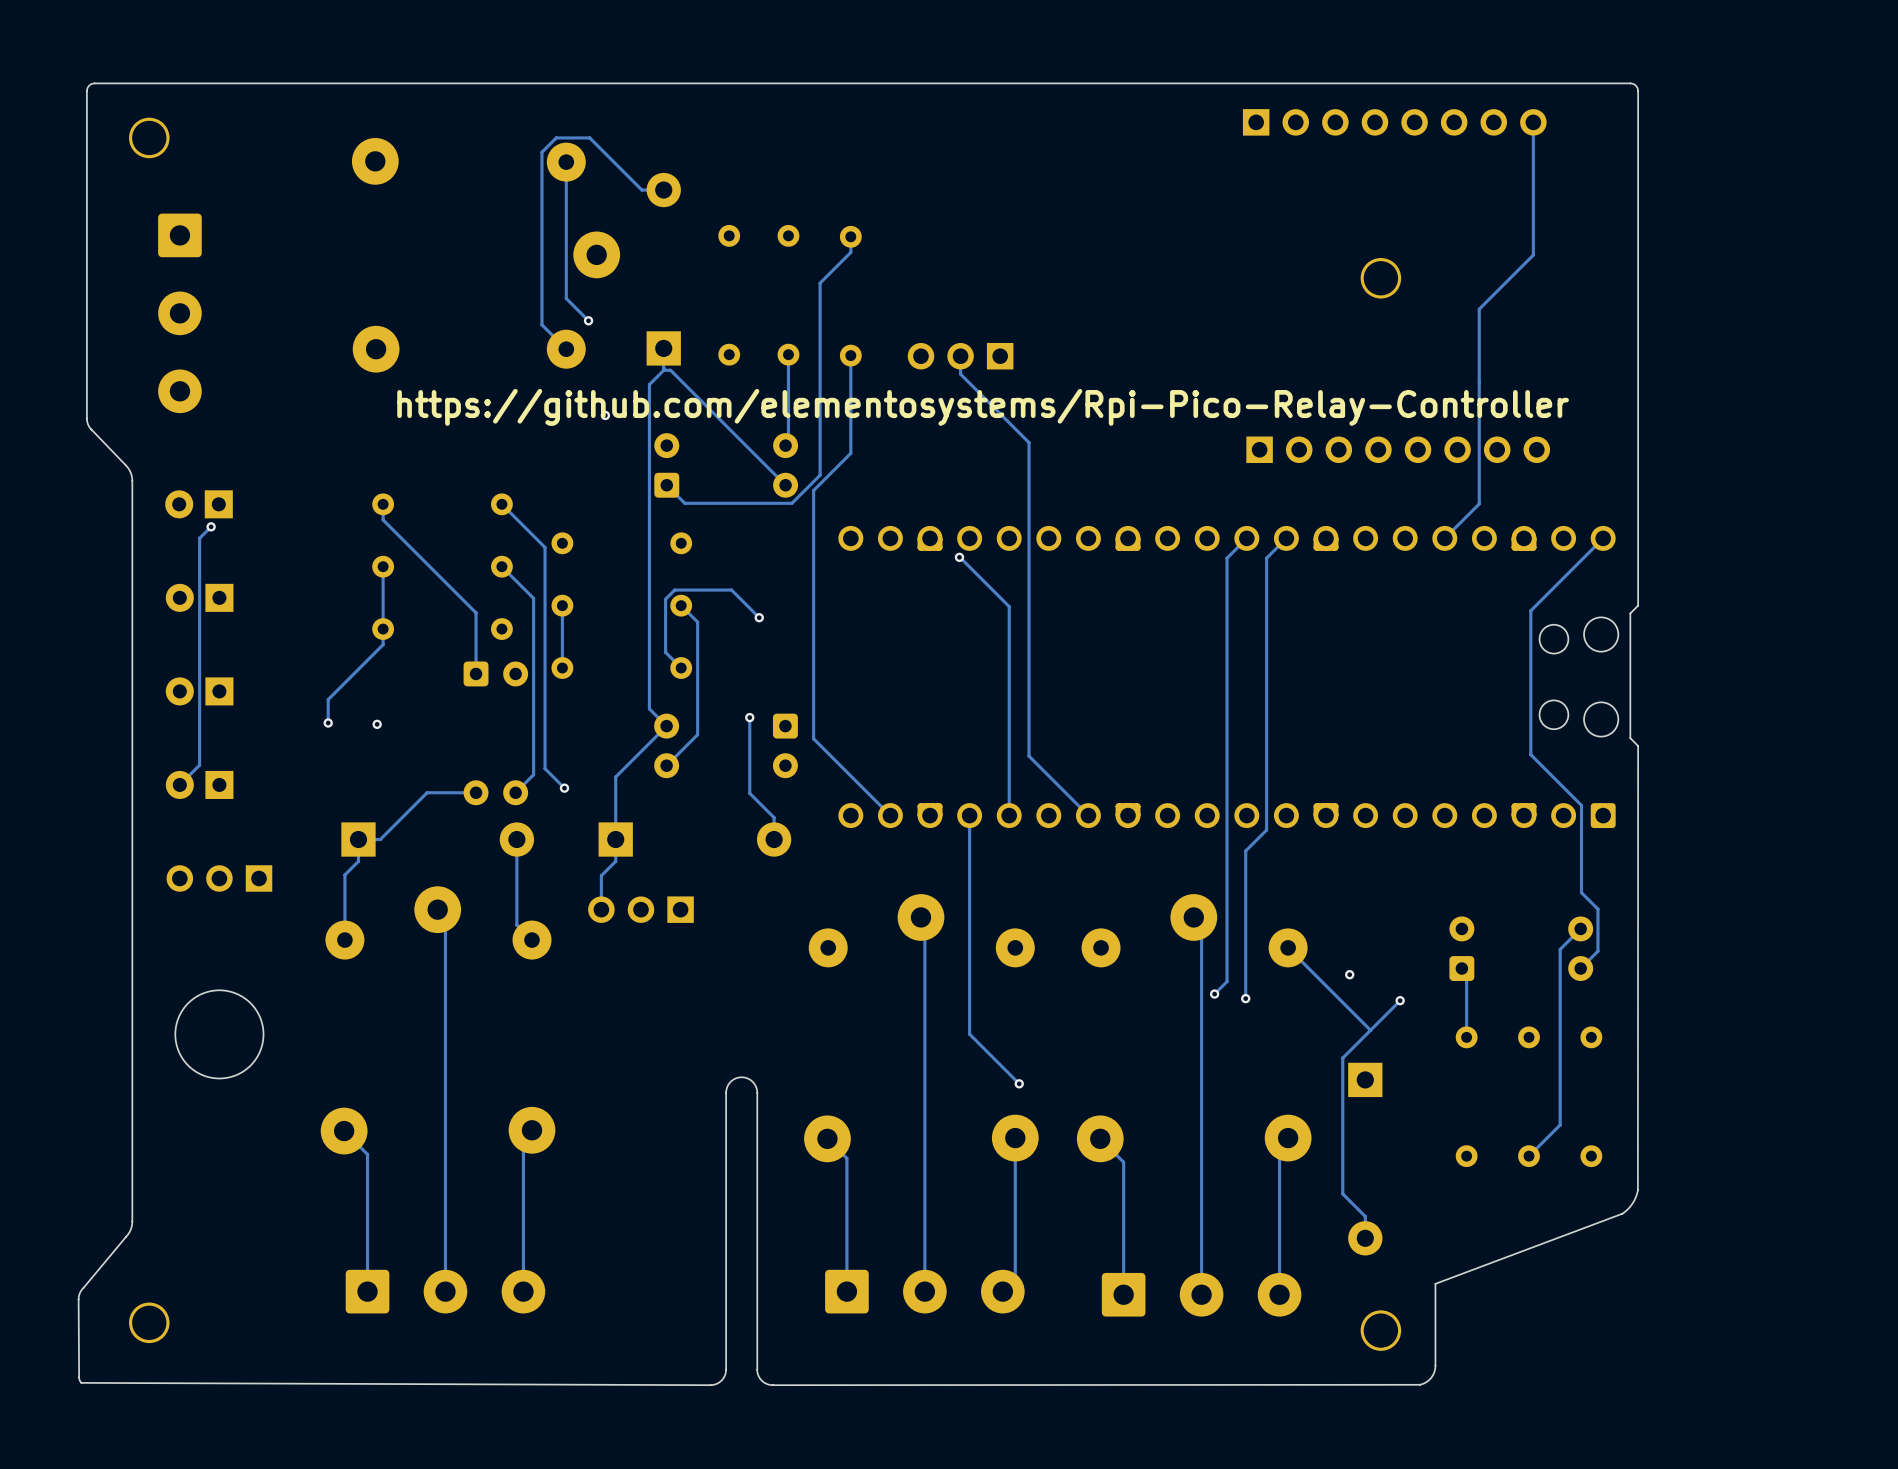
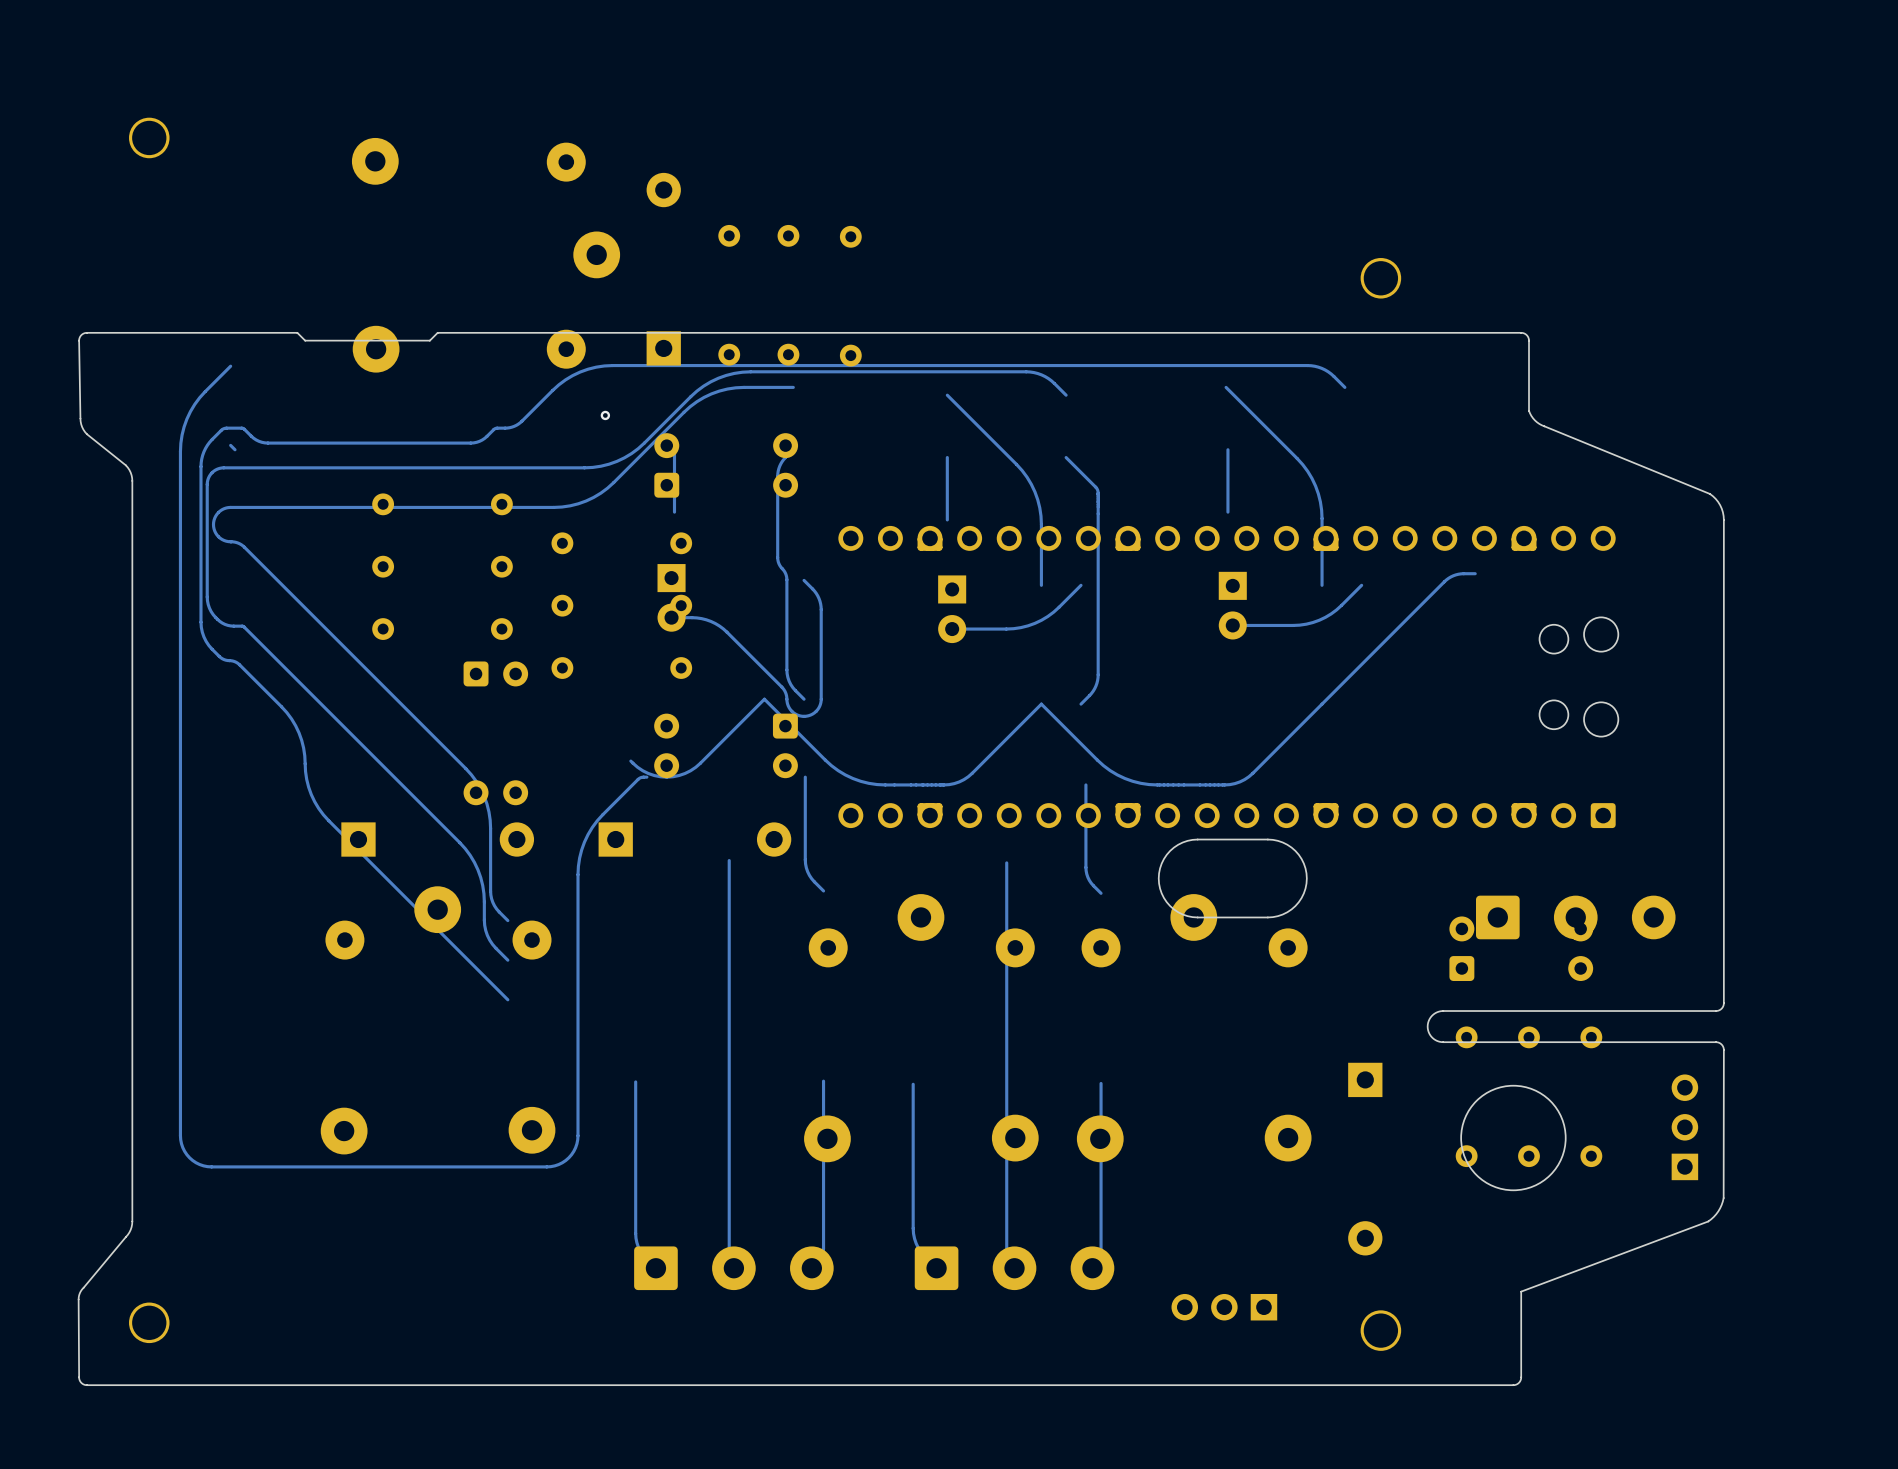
part: (1394, 122) -> none
track: (1533, 122) (1533, 255) (1479, 309) (1479, 503) (1444, 538) -> none
track: (566, 162) (566, 298) (588, 320) -> none
track: (663, 190) (641, 190) (589, 137) (556, 137) (541, 152) (541, 324) (566, 349) -> none
track: (850, 236) (850, 252) (820, 283) (820, 475) (791, 503) (684, 503) (666, 485) -> none
part: (179, 313) -> none
via: (588, 320) -> none
track: (788, 354) (788, 442) (785, 445) -> none
track: (850, 355) (850, 453) (813, 490) (813, 738) (890, 815) -> none
track: (960, 356) (960, 374) (1029, 442) (1029, 756) (1088, 815) -> none
part: (960, 356) -> none
track: none -> (230, 366) (194, 404) (184, 426) (180, 443) (180, 1135) (182, 1147) (189, 1157) (199, 1164) (211, 1166) (546, 1166) (558, 1164) (565, 1160) (575, 1147) (578, 1135) (578, 874) (579, 858) (584, 842) (597, 820) (638, 778) (646, 777)
track: (663, 370) (670, 370) (785, 485) -> none
track: (663, 370) (649, 384) (649, 708) (666, 726) (615, 777) (615, 861) (601, 875) (601, 909) -> none
track: none -> (793, 387) (735, 387) (719, 391) (704, 397) (684, 412) (607, 488) (586, 500) (570, 505) (553, 507) (230, 507) (222, 509) (215, 516) (213, 526) (218, 536) (244, 547) (465, 768) (476, 781) (486, 803) (490, 820) (491, 898) (496, 909) (507, 920)
track: none -> (1226, 387) (1297, 458) (1312, 478) (1318, 493) (1321, 510) (1322, 585)
track: none -> (1344, 387) (1325, 369) (1307, 365) (612, 365) (596, 367) (572, 375) (558, 384) (518, 424) (509, 427) (495, 428) (482, 440) (473, 442) (267, 443) (256, 439) (242, 428) (222, 429) (207, 445) (201, 462) (200, 622) (206, 641) (220, 657) (239, 664) (291, 719) (299, 732) (303, 748) (308, 787) (314, 801) (323, 814) (507, 999)
track: none -> (947, 395) (1016, 464) (1031, 484) (1037, 499) (1041, 516) (1041, 585)
track: none -> (1066, 395) (1048, 378) (1030, 371) (742, 372) (726, 375) (703, 386) (638, 448) (616, 461) (601, 466) (584, 467) (223, 467) (212, 472) (207, 484) (207, 596) (211, 611) (225, 624) (244, 626) (465, 848) (474, 862) (480, 877) (483, 893) (484, 925) (487, 935) (492, 944) (507, 960)
text: https://github.com/elementosystems/Rpi-Pico-Relay-Controller (983, 407) -> none
track: none -> (230, 445) (235, 449)
track: none -> (793, 449) (782, 461) (777, 473) (777, 557) (786, 578) (787, 673) (790, 684) (804, 699)
track: none -> (1227, 449) (1227, 512)
part: (1398, 449) -> none
track: none -> (947, 457) (947, 519)
track: none -> (1066, 457) (1095, 487) (1098, 492) (1098, 677) (1093, 691) (1081, 704)
board edge: (125, 465) (90, 428) (86, 420) (86, 91) (88, 86) (92, 83) (1630, 83) (1636, 86) (1638, 91) (1638, 605) (1630, 613) (1630, 738) (1638, 745) (1637, 1190) (1632, 1203) (1622, 1213) (1435, 1283) (1435, 1367) (1431, 1378) (1419, 1384) (772, 1385) (761, 1380) (757, 1369) -> (125, 465) (86, 434) (81, 424) (79, 340) (80, 335) (84, 333) (297, 332) (305, 340) (429, 340) (437, 332) (1524, 333) (1529, 340) (1529, 410) (1534, 420) (1541, 425) (1709, 493) (1718, 501) (1722, 512) (1723, 1004) (1721, 1008) (1716, 1011) (1441, 1011) (1430, 1017) (1428, 1022) (1428, 1030) (1433, 1038) (1443, 1042) (1719, 1043) (1723, 1049) (1723, 1198) (1718, 1211) (1708, 1221) (1521, 1291) (1521, 1378) (1518, 1382) (1514, 1385) (86, 1385) (81, 1382) (79, 1377)
part: (199, 504) -> none
track: (383, 504) (383, 519) (476, 612) (476, 673) -> none
track: (501, 504) (545, 547) (545, 768) (564, 788) -> none
track: (211, 526) (199, 538) (199, 765) (179, 784) -> none
via: (211, 526) -> none
track: (1246, 538) (1227, 558) (1227, 981) (1214, 994) -> none
track: (1286, 538) (1266, 558) (1266, 830) (1245, 850) (1245, 998) -> none
track: (1603, 538) (1530, 610) (1530, 754) (1581, 805) (1581, 892) (1597, 909) (1597, 951) (1580, 968) -> none
track: (959, 557) (1009, 606) (1009, 815) -> none
via: (959, 557) -> none
track: (383, 566) (383, 644) (328, 699) (328, 722) -> none
track: (501, 566) (533, 598) (533, 774) (515, 792) -> none
track: none -> (1475, 573) (1458, 574) (1446, 579) (1252, 773) (1235, 783) (1157, 784) (1140, 783) (1124, 778) (1103, 765) (1041, 704) (968, 776) (949, 784) (877, 784) (852, 778) (831, 765) (764, 699) (700, 763) (685, 773) (666, 777) (654, 775) (642, 770) (630, 761)
track: none -> (804, 580) (817, 595) (821, 609) (821, 700) (817, 710) (808, 715) (799, 715) (791, 711) (782, 688) (719, 625) (701, 618) (671, 617)
track: none -> (1081, 585) (1053, 612) (1028, 625) (1006, 629) (952, 629)
track: none -> (1361, 585) (1336, 609) (1313, 622) (1293, 625) (1232, 625)
part: (199, 597) -> none
part: none -> (671, 597)
track: (562, 605) (562, 668) -> (674, 449) (674, 512)
track: (681, 605) (697, 622) (697, 734) (666, 765) -> none
part: none -> (1232, 605)
part: none -> (952, 609)
track: (759, 617) (731, 590) (674, 590) (665, 599) (665, 652) (681, 668) -> none
via: (759, 617) -> none
part: (199, 691) -> none
track: (749, 717) (749, 793) (774, 817) (774, 839) -> none
via: (749, 717) -> none
via: (328, 722) -> none
via: (377, 724) -> none
track: none -> (805, 777) (805, 863) (809, 875) (823, 890)
part: (199, 784) -> none
track: none -> (1085, 784) (1086, 870) (1089, 880) (1101, 893)
via: (564, 788) -> none
track: (476, 792) (427, 792) (380, 839) (358, 839) (358, 861) (344, 874) (344, 940) -> none
track: (969, 815) (969, 1034) (1019, 1083) -> none
track: (516, 839) (516, 924) (532, 940) -> none
board edge: none -> (1267, 839) (1197, 839) (1178, 844) (1166, 854) (1160, 868) (1159, 883) (1163, 897) (1173, 909) (1192, 917) (1267, 917) (1287, 912) (1298, 902) (1303, 893) (1306, 883) (1305, 868) (1298, 854) (1291, 847) (1277, 840) (1267, 839)
track: none -> (729, 860) (729, 1260) (733, 1268)
track: none -> (1006, 862) (1006, 1254) (1008, 1261) (1014, 1268)
part: (219, 878) -> none
track: (437, 909) (445, 917) (445, 1291) -> none
part: (640, 909) -> none
track: (920, 917) (924, 921) (924, 1291) -> none
track: (1193, 917) (1201, 925) (1201, 1294) -> none
part: none -> (1575, 917)
track: (1580, 928) (1560, 949) (1560, 1124) (1529, 1156) -> none
track: (1288, 947) (1370, 1030) -> none
track: (1461, 968) (1466, 973) (1466, 1037) -> none
via: (1349, 974) -> none
round board edge: [174, 989, 264, 1079] -> none
via: (1214, 994) -> none
via: (1245, 998) -> none
track: (1400, 1000) (1370, 1030) -> none
via: (1400, 1000) -> none
track: (1370, 1030) (1342, 1058) (1342, 1193) (1365, 1216) (1365, 1238) -> none
track: none -> (635, 1081) (635, 1238) (640, 1250) (655, 1268)
track: none -> (823, 1081) (823, 1248) (820, 1258) (811, 1268)
via: (1019, 1083) -> none
track: none -> (1101, 1083) (1101, 1253) (1099, 1260) (1092, 1268)
track: none -> (913, 1084) (913, 1233) (918, 1248) (936, 1268)
round board edge: none -> [1460, 1085, 1567, 1191]
part: none -> (1684, 1127)
track: (532, 1130) (523, 1138) (523, 1291) -> none
track: (344, 1131) (367, 1154) (367, 1291) -> none
track: (827, 1138) (846, 1158) (846, 1291) -> none
track: (1015, 1138) (1015, 1279) (1002, 1291) -> none
track: (1100, 1138) (1123, 1162) (1123, 1294) -> none
track: (1288, 1138) (1279, 1146) (1279, 1294) -> none
part: none -> (733, 1268)
part: (445, 1291) -> none
part position: (924, 1291) -> (1014, 1268)
part: (1201, 1294) -> none
part: none -> (1224, 1307)
board edge: (757, 1369) (757, 1092) (752, 1081) (741, 1077) (730, 1081) (726, 1090) (726, 1369) (723, 1377) (717, 1383) (710, 1385) (81, 1382) (79, 1377) -> none

